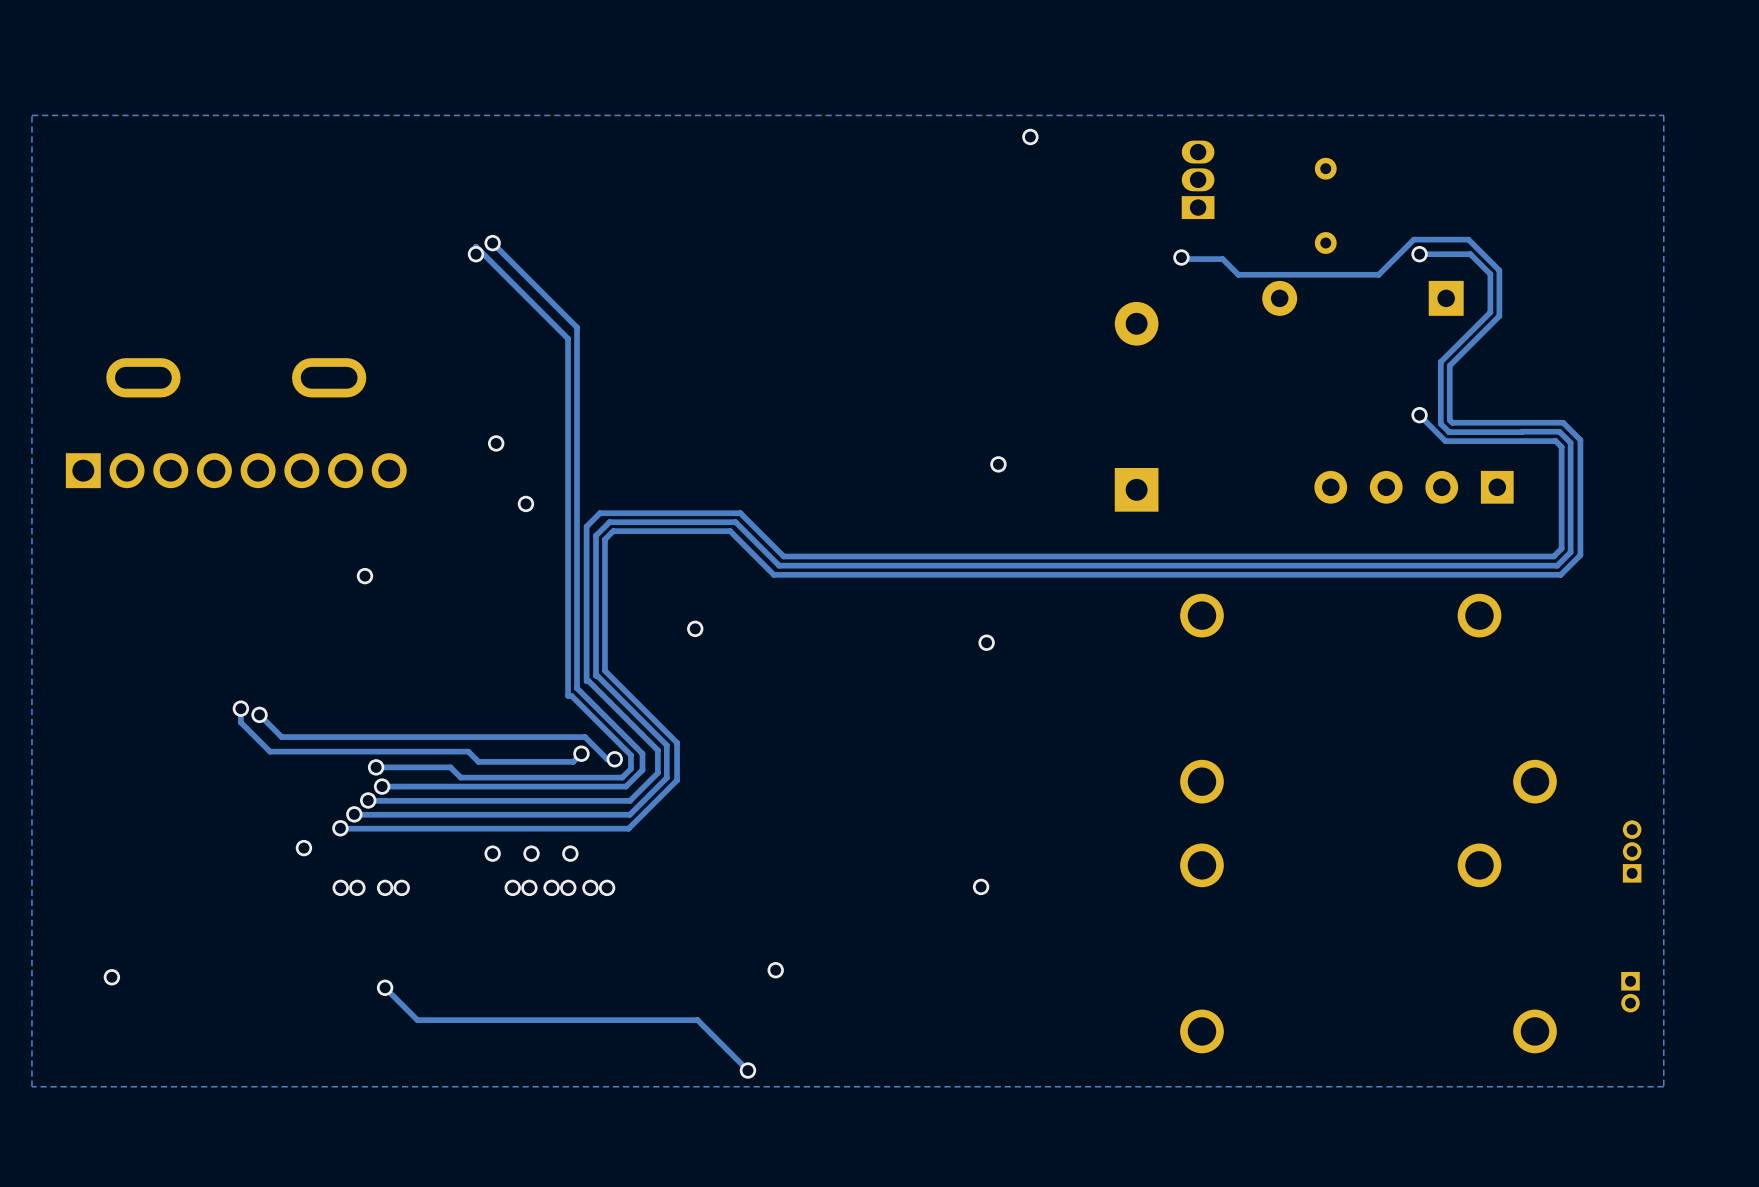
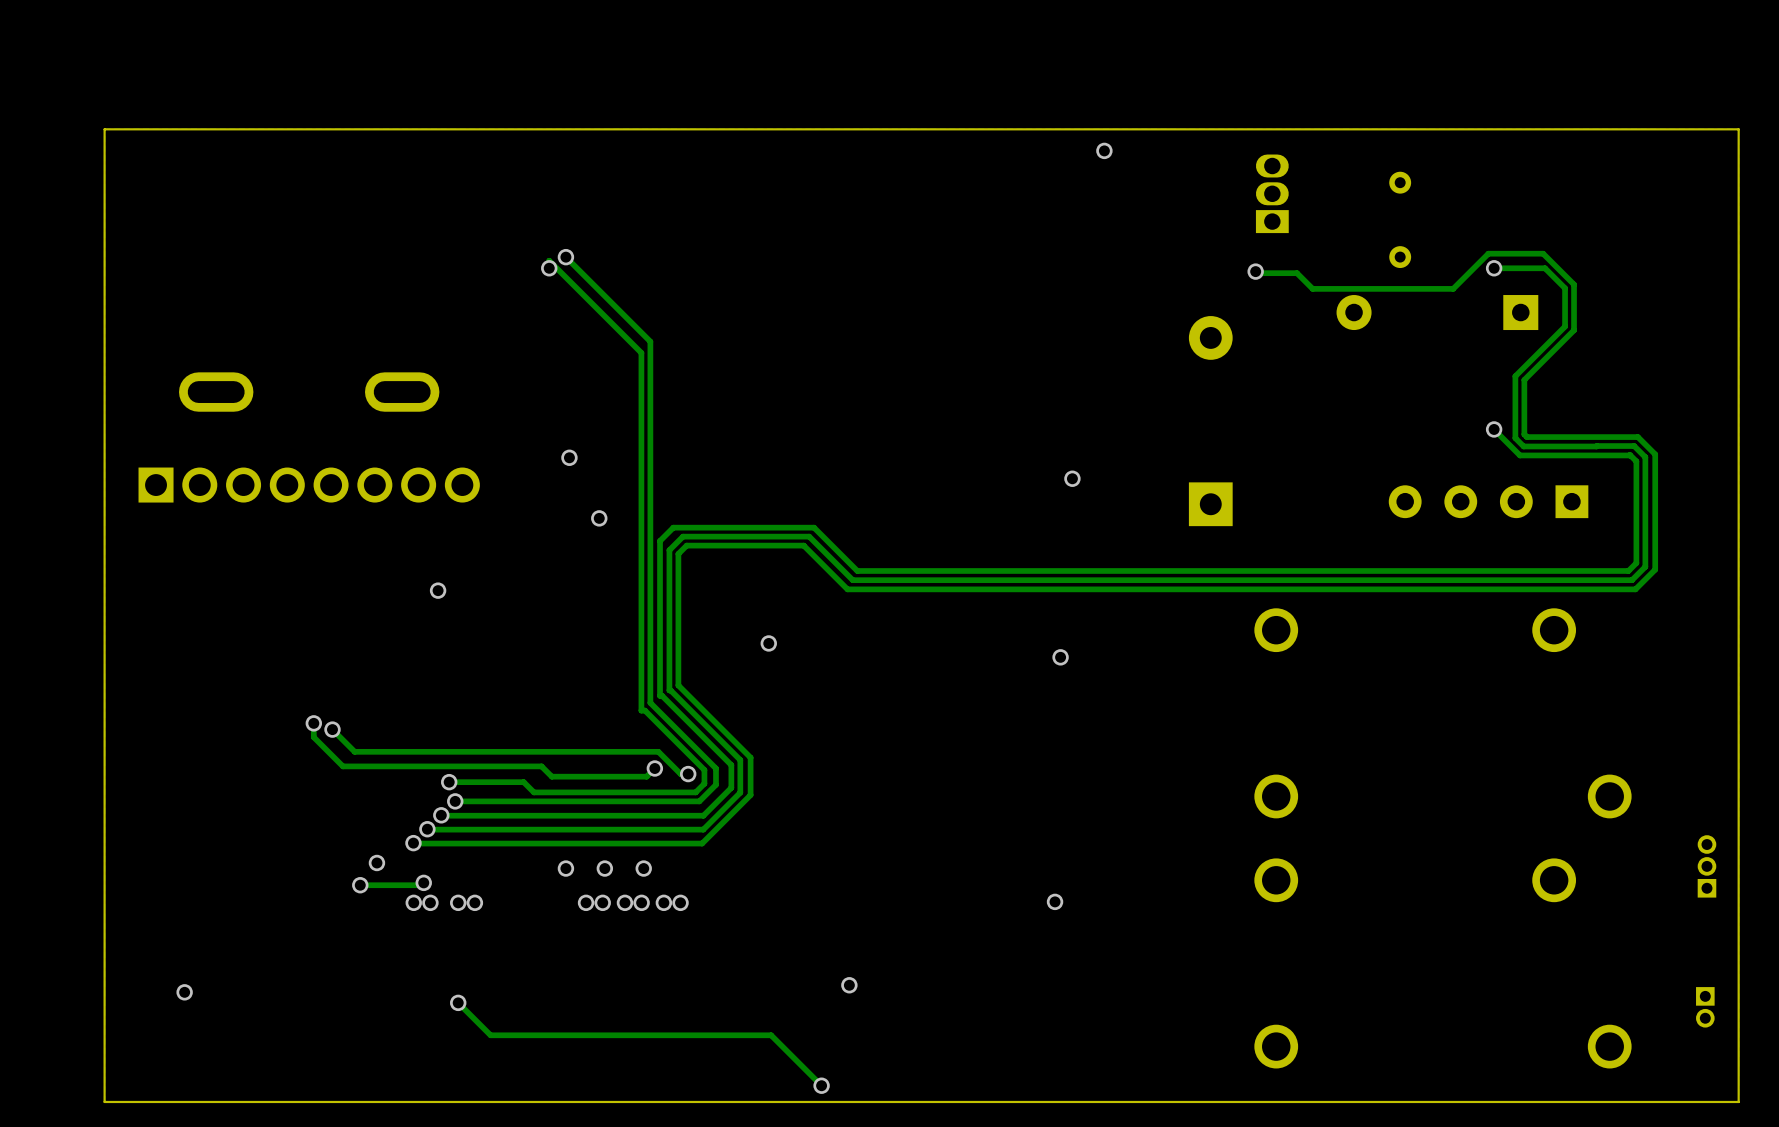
board edge: none -> (1738, 129) (104, 129) (104, 1101) (1738, 1101) (1738, 129)
track: none -> (423, 882) (421, 885) (360, 885)
via: none -> (423, 882)
via: none -> (360, 885)

